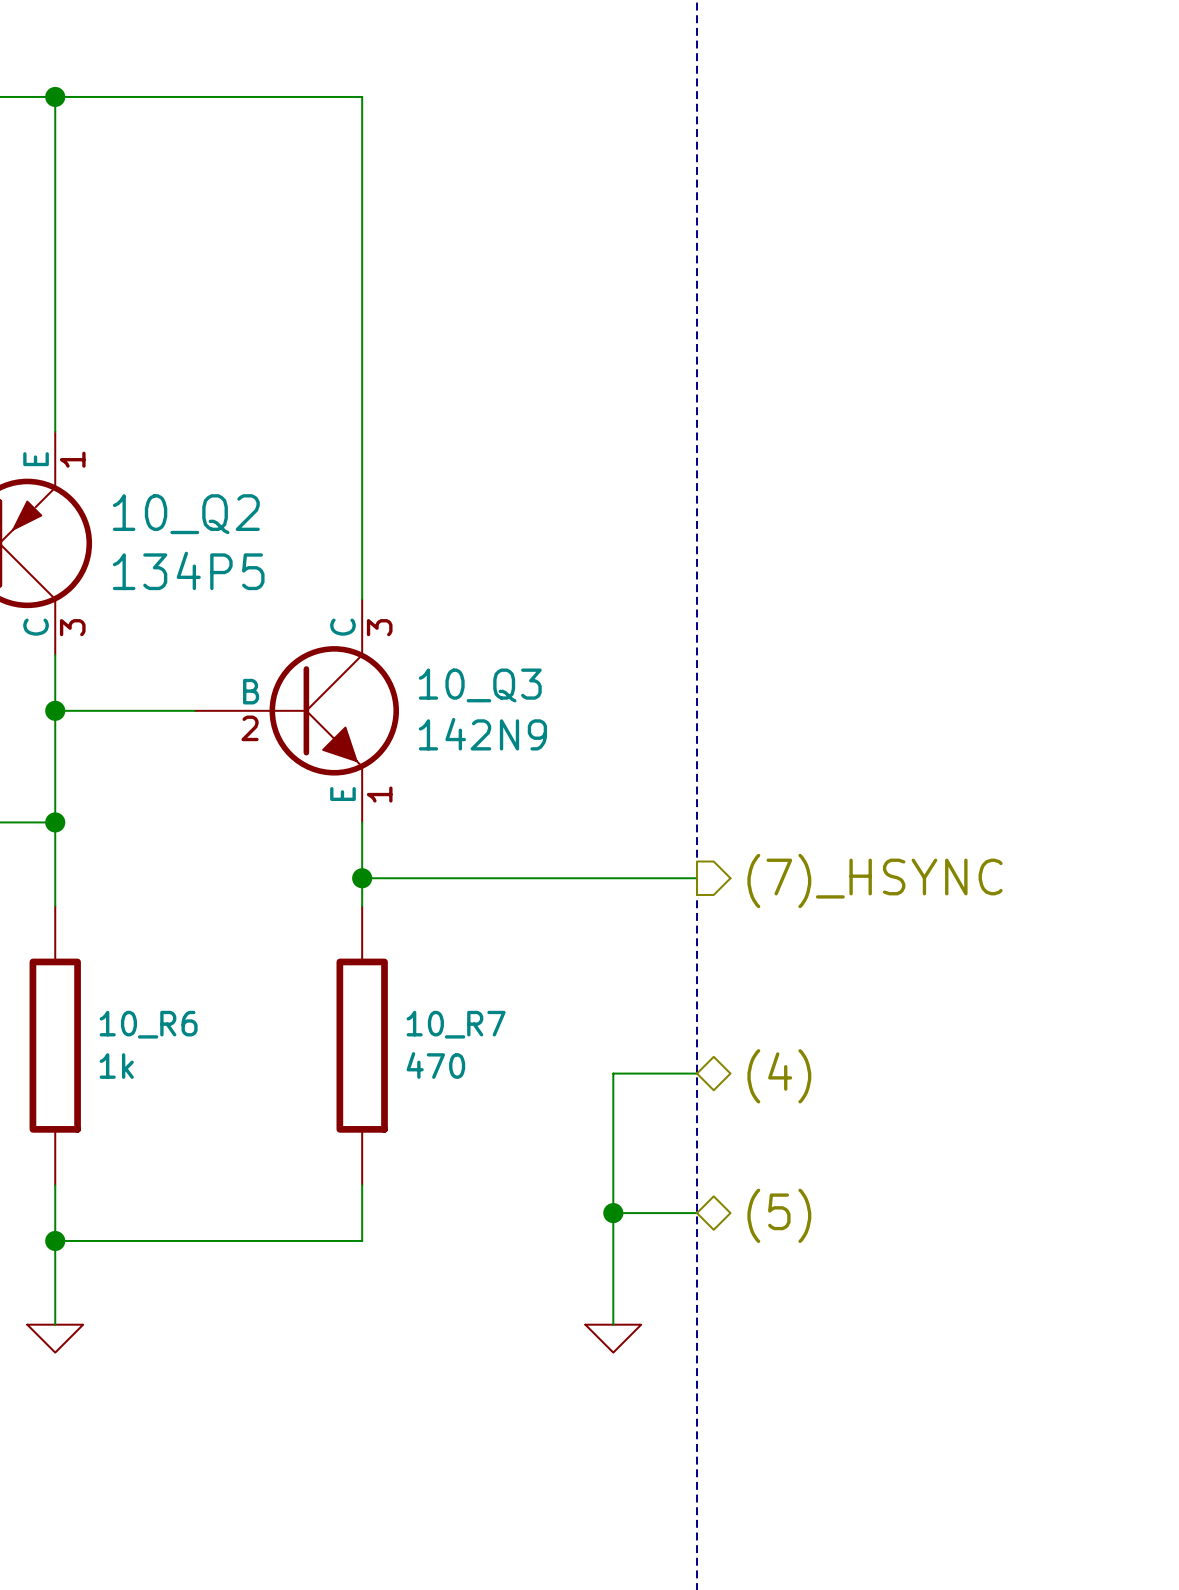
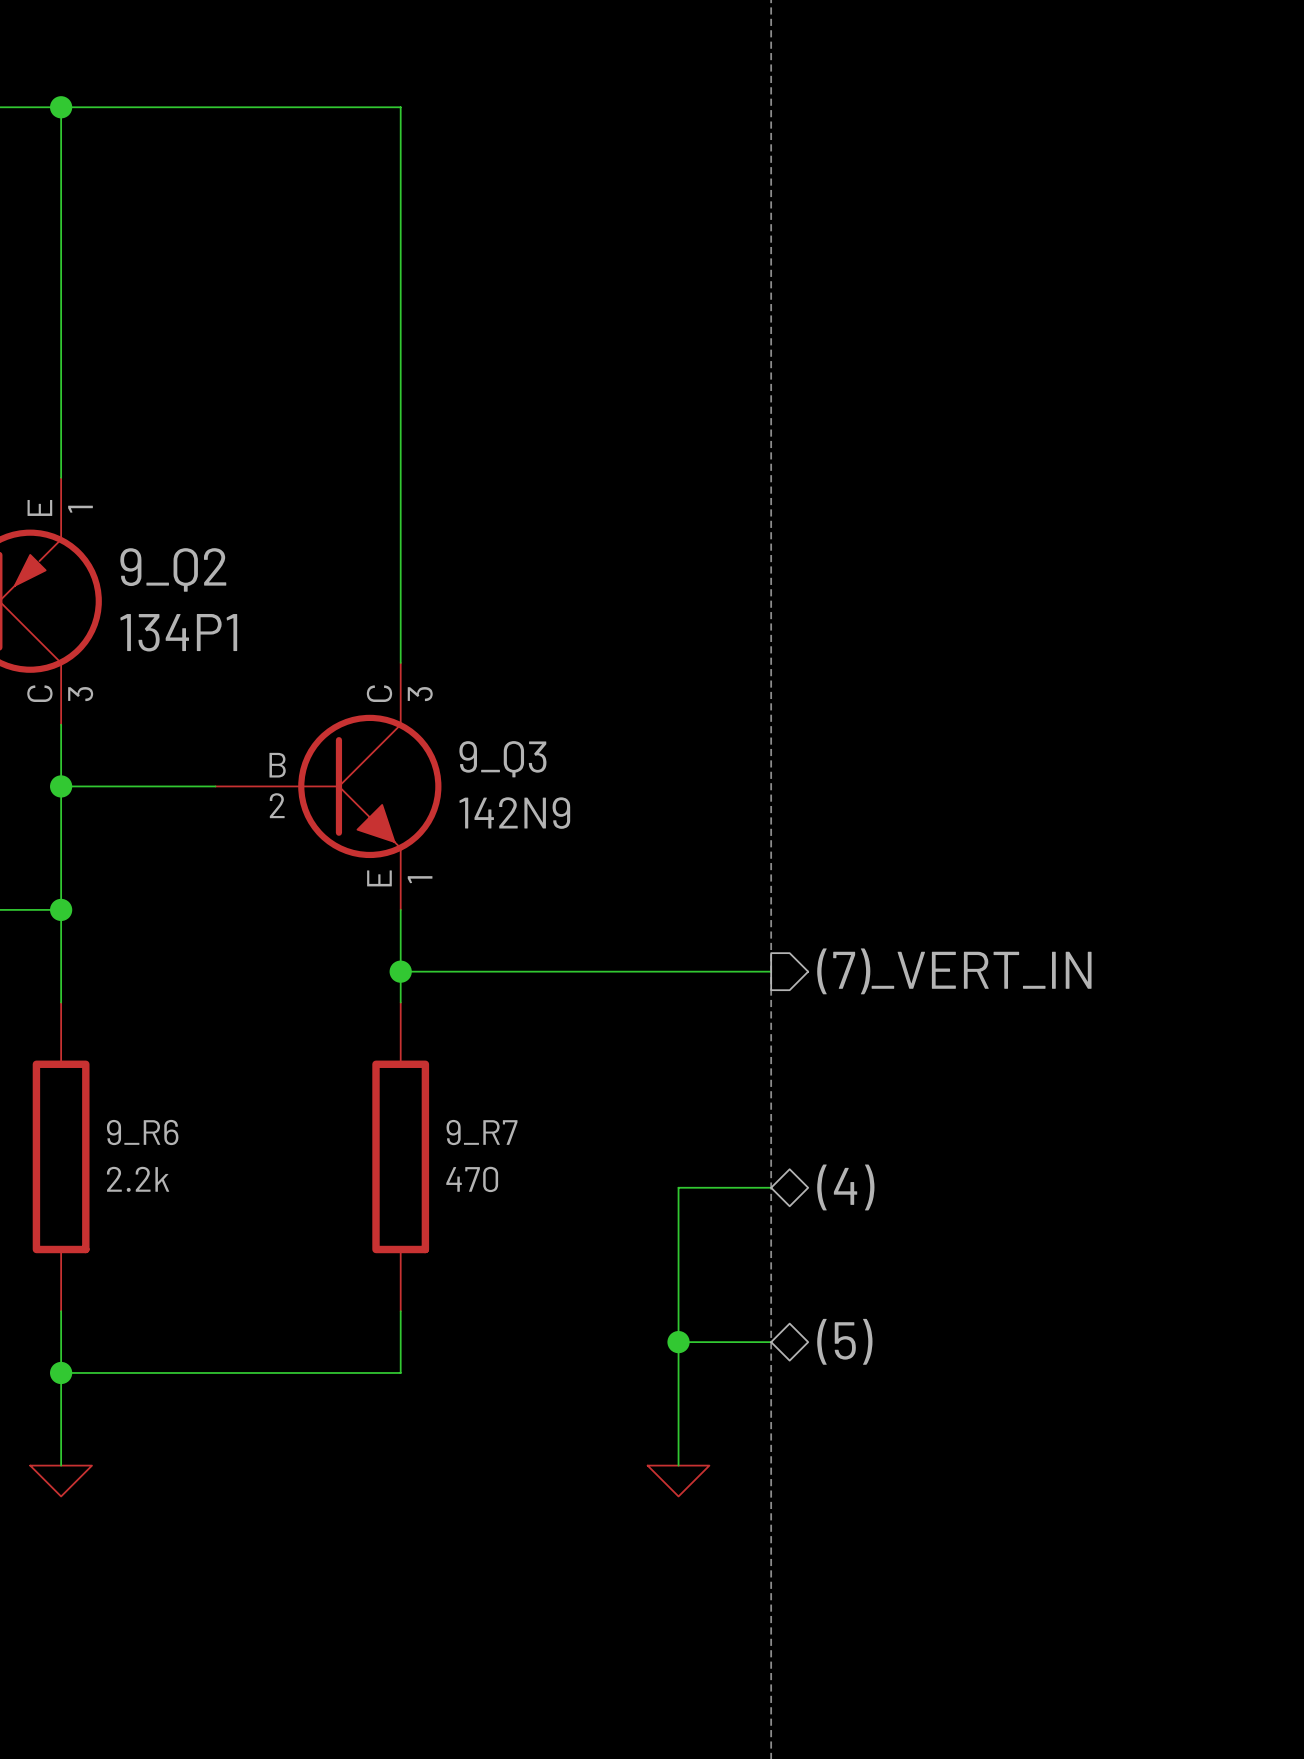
10_Q2 name: 10_Q2 (186, 514) -> 9_Q2 (173, 569)
10_Q2 value: 134P5 (188, 570) -> 134P1 (178, 632)
10_Q3 name: 10_Q3 (480, 685) -> 9_Q3 (502, 759)
hierarchical label: (7)_HSYNC (875, 880) -> (7)_VERT_IN (954, 971)
10_R6 name: 10_R6 (148, 1024) -> 9_R6 (142, 1132)
10_R7 name: 10_R7 (456, 1024) -> 9_R7 (482, 1132)
10_R6 value: 1k (116, 1066) -> 2.2k (138, 1179)

